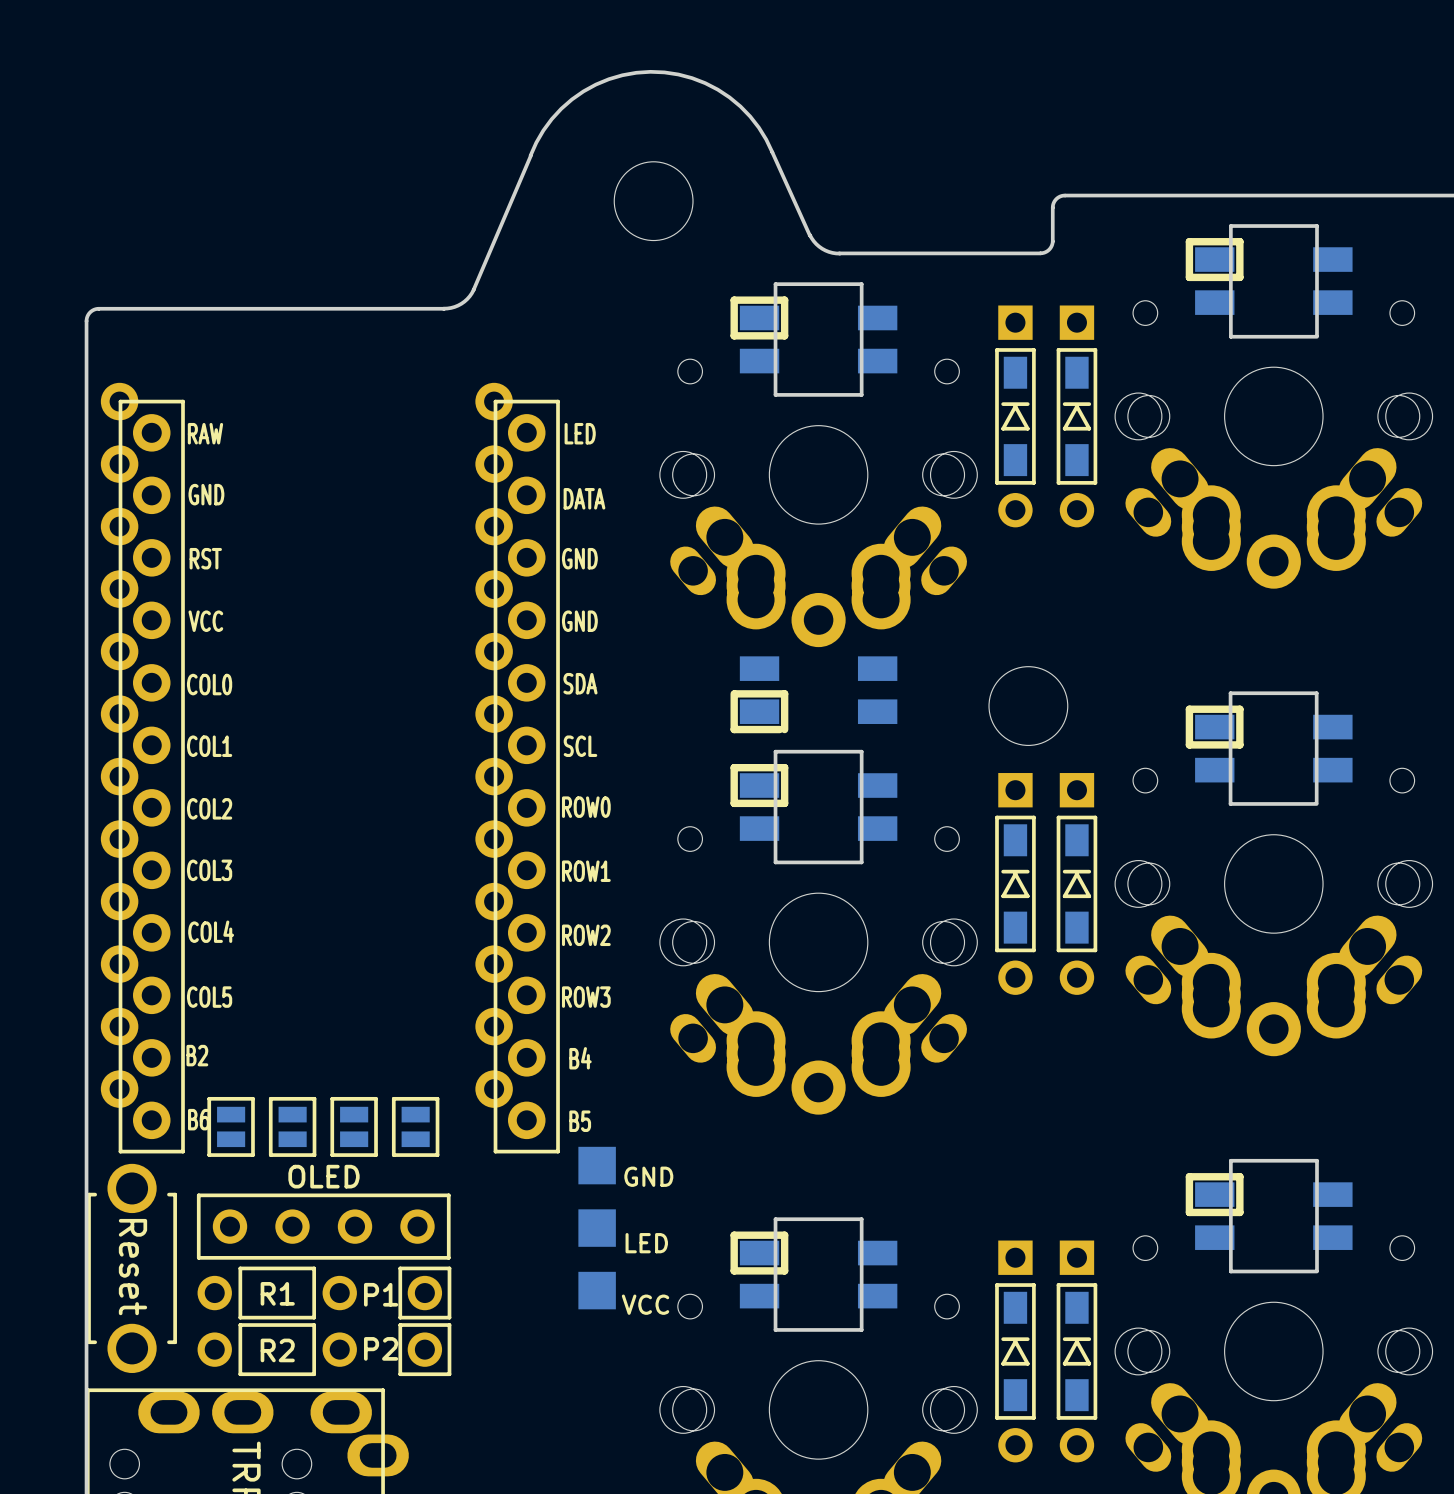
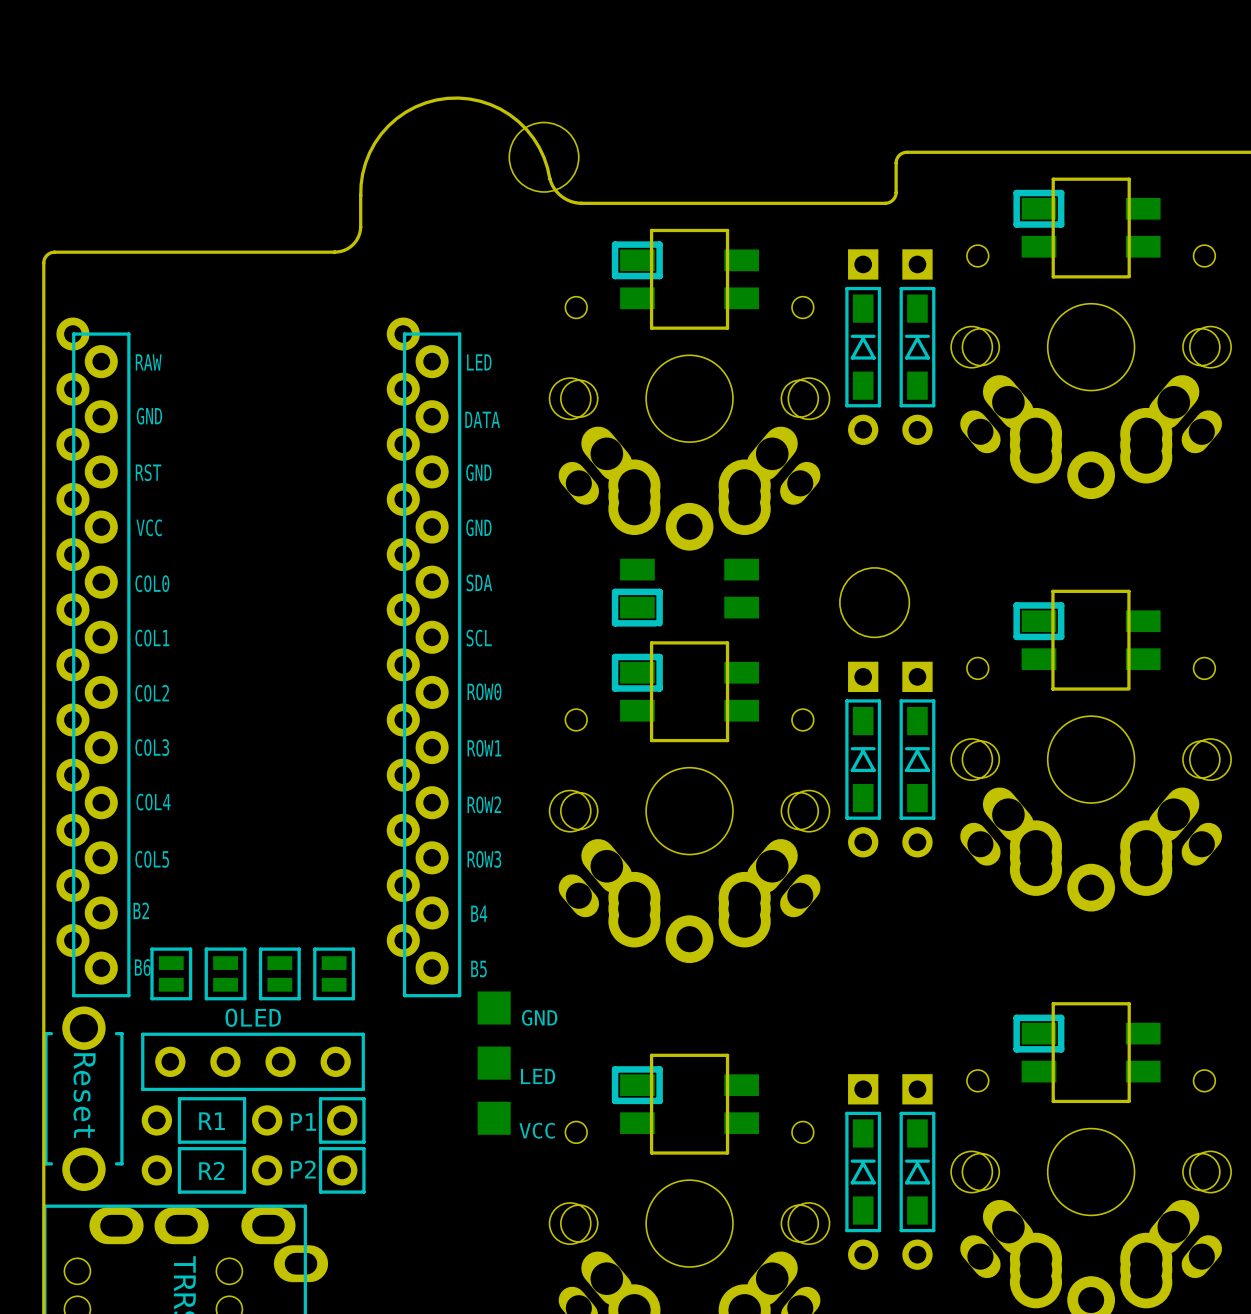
board edge: (530, 155) (536, 142) (551, 119) (571, 99) (595, 84) (622, 75) (650, 71) (664, 72) (692, 78) (717, 89) (729, 97) (740, 106) (758, 127) (772, 152) (809, 235) -> none
board edge: (530, 155) (473, 289) -> none
board edge: none -> (549, 178) (554, 188) (561, 196) (571, 201) (581, 203)
board edge: none -> (549, 178) (539, 147) (526, 129) (510, 114) (480, 101) (447, 98) (415, 106) (388, 125) (374, 143) (365, 163) (360, 195)
board edge: (809, 234) (822, 248) (839, 253) -> (581, 203) (707, 203)
board edge: (473, 289) (461, 303) (443, 308) -> none
board edge: (444, 308) (416, 308) -> (360, 195) (360, 227) (358, 236) (347, 248) (334, 252)

